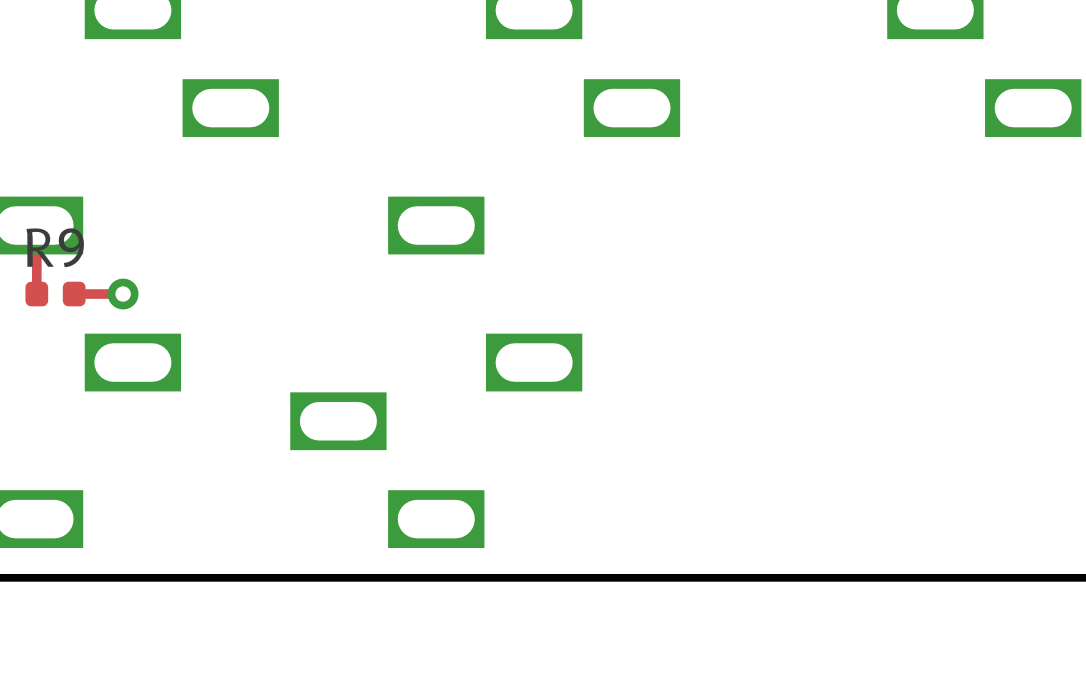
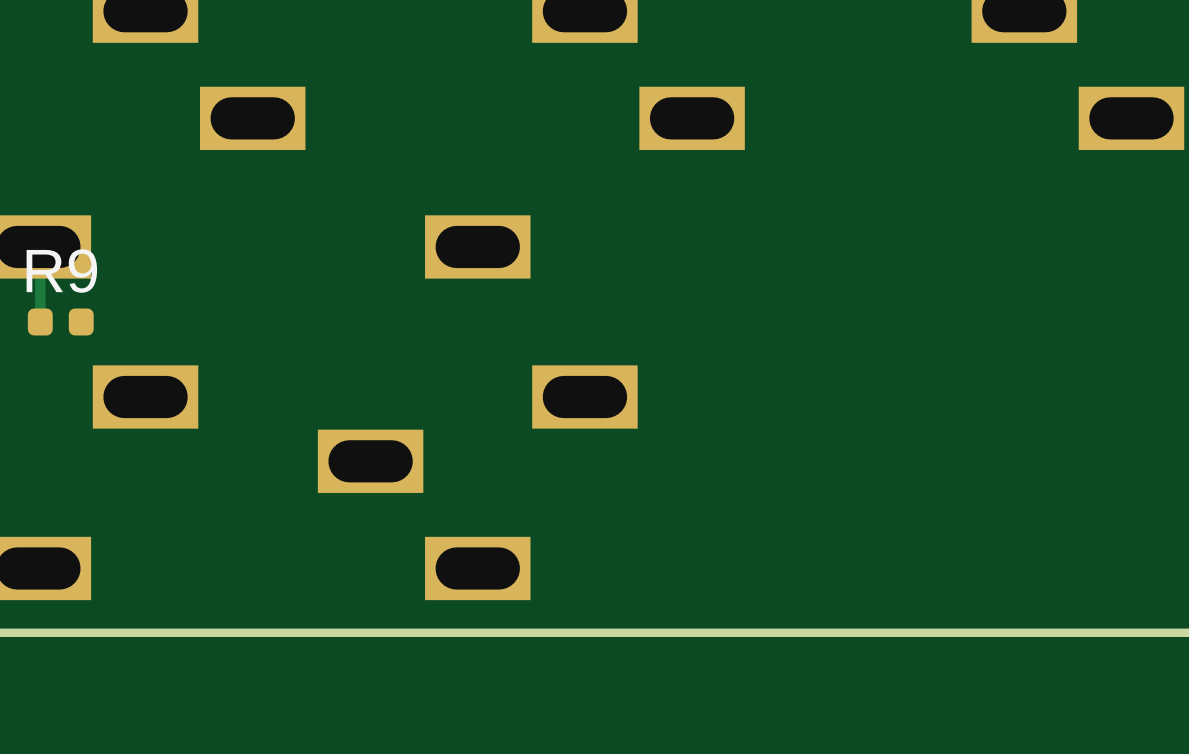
track: (74, 294) (123, 294) -> none
via: (123, 294) -> none

